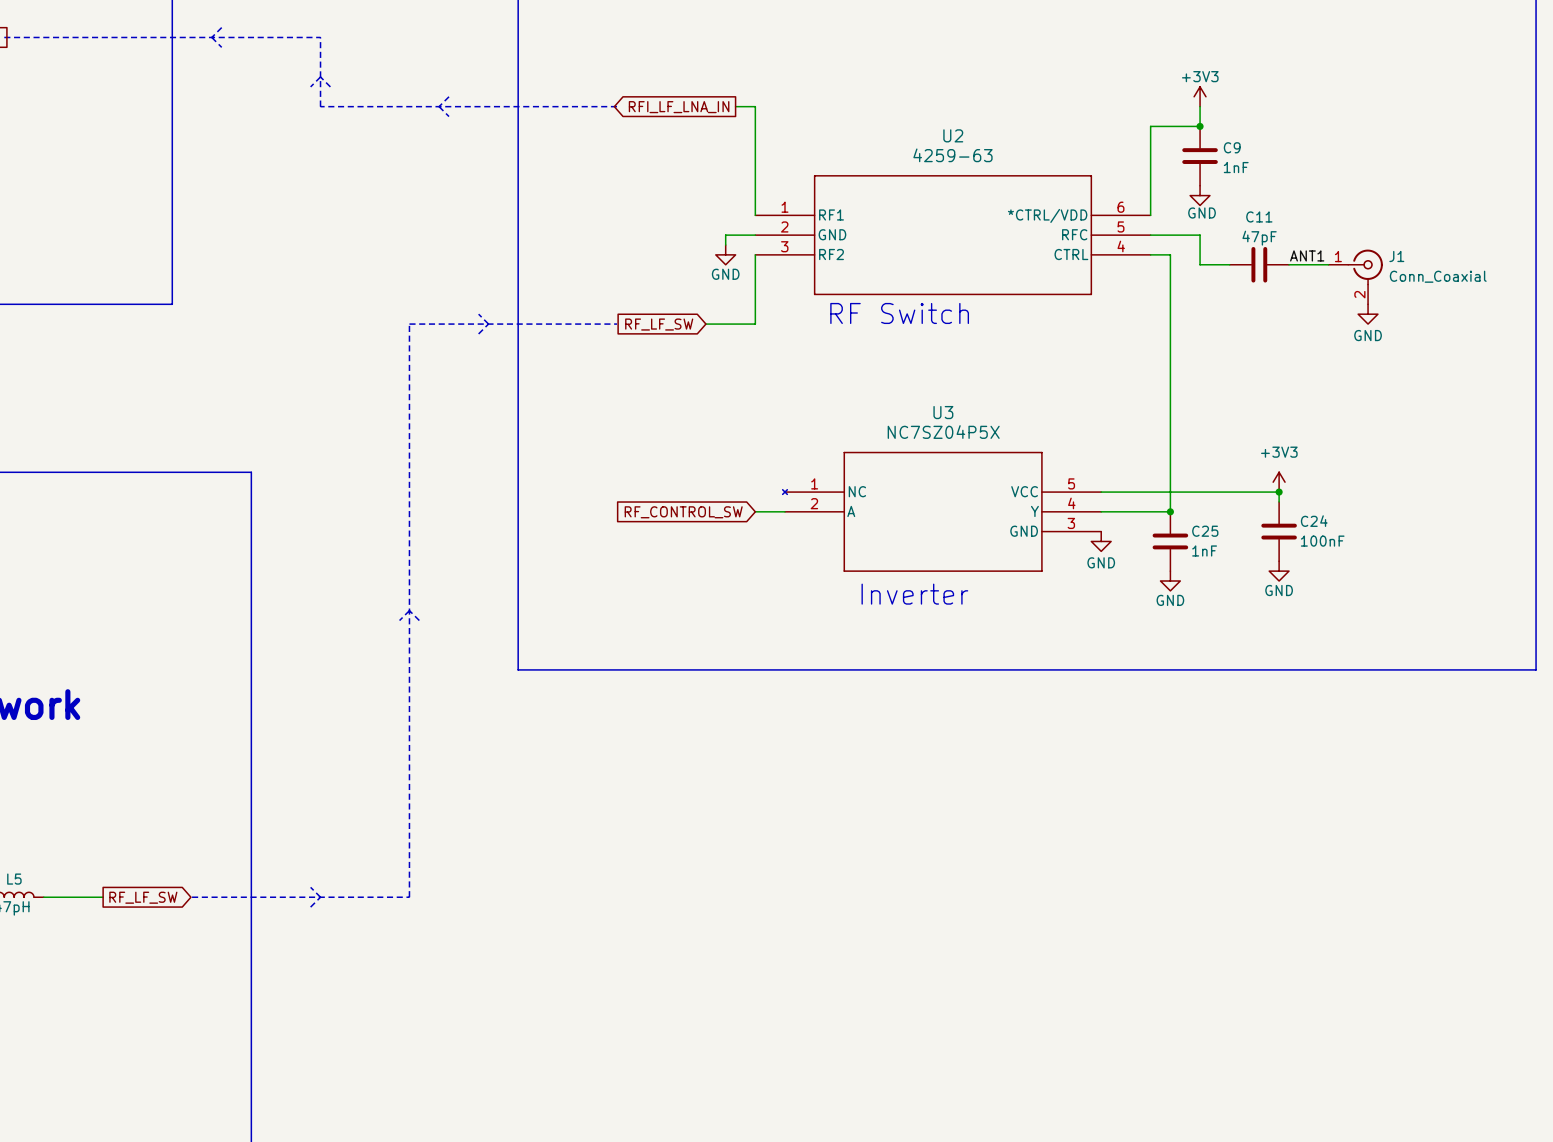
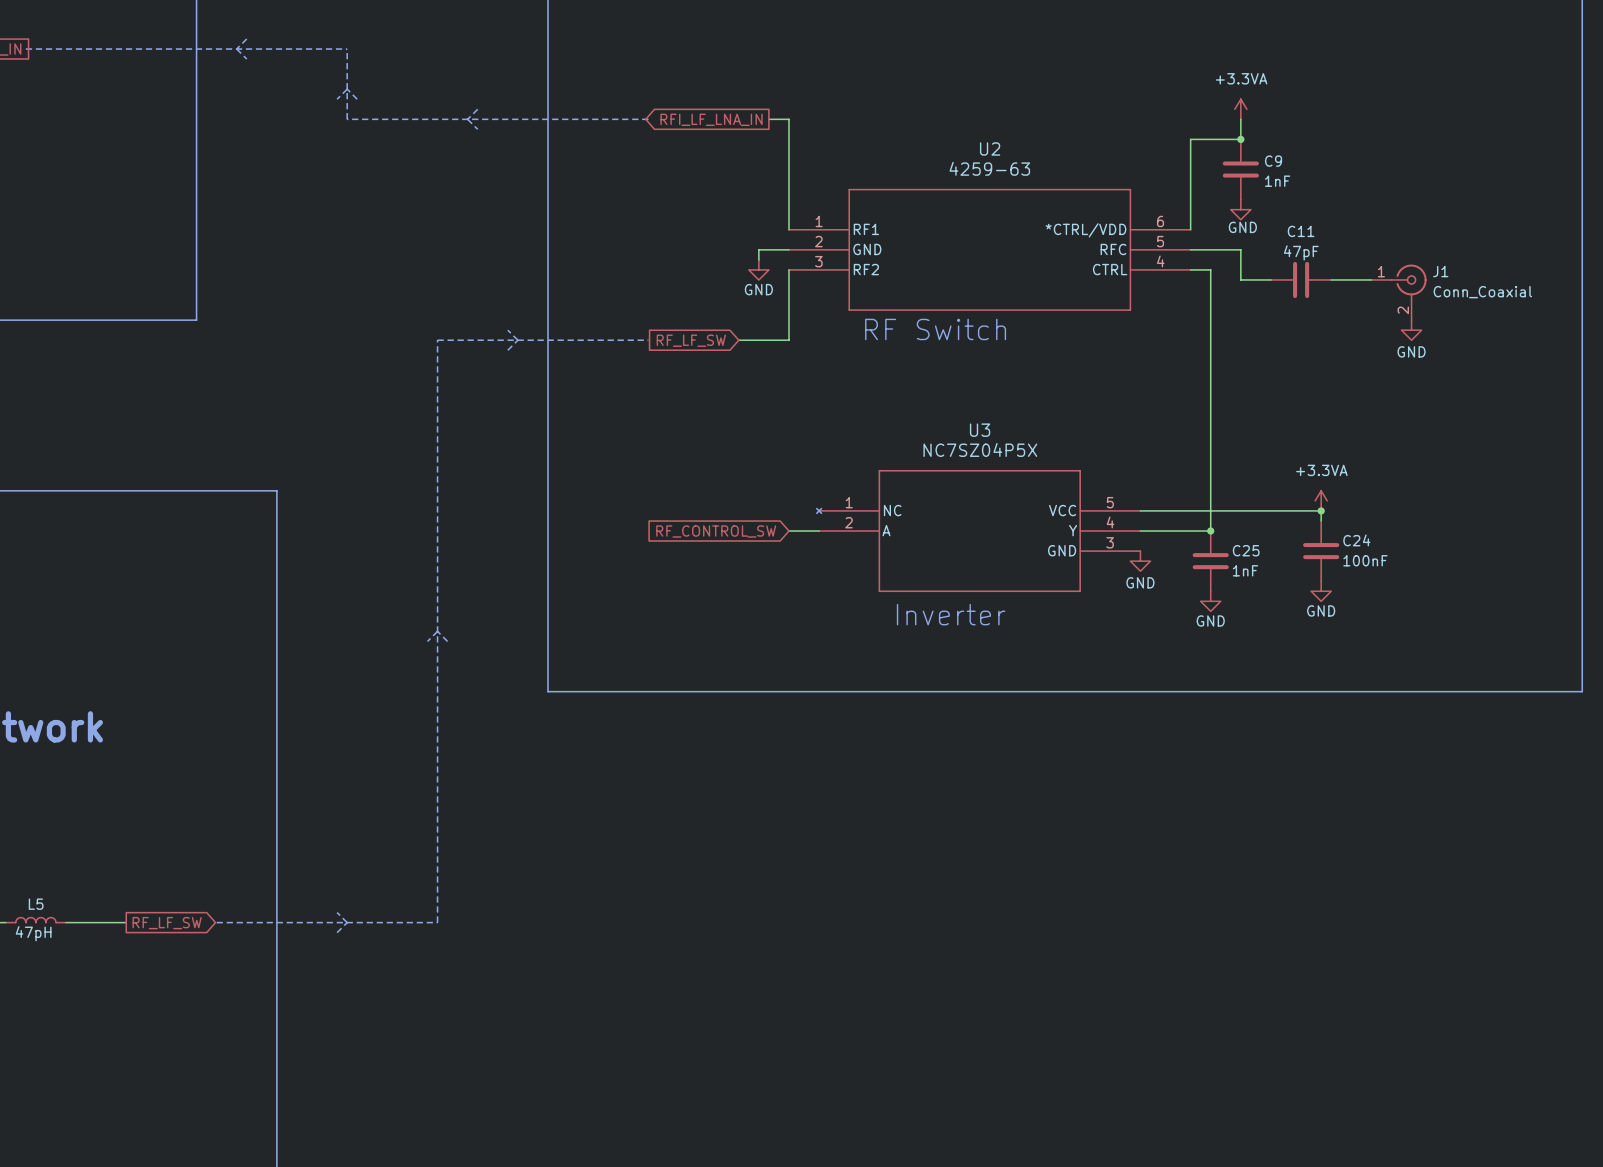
power symbol: +3V3 (1200, 96) -> +3.3VA (1240, 109)
label: ANT1 (1307, 255) -> none
power symbol: +3V3 (1279, 482) -> +3.3VA (1321, 500)

